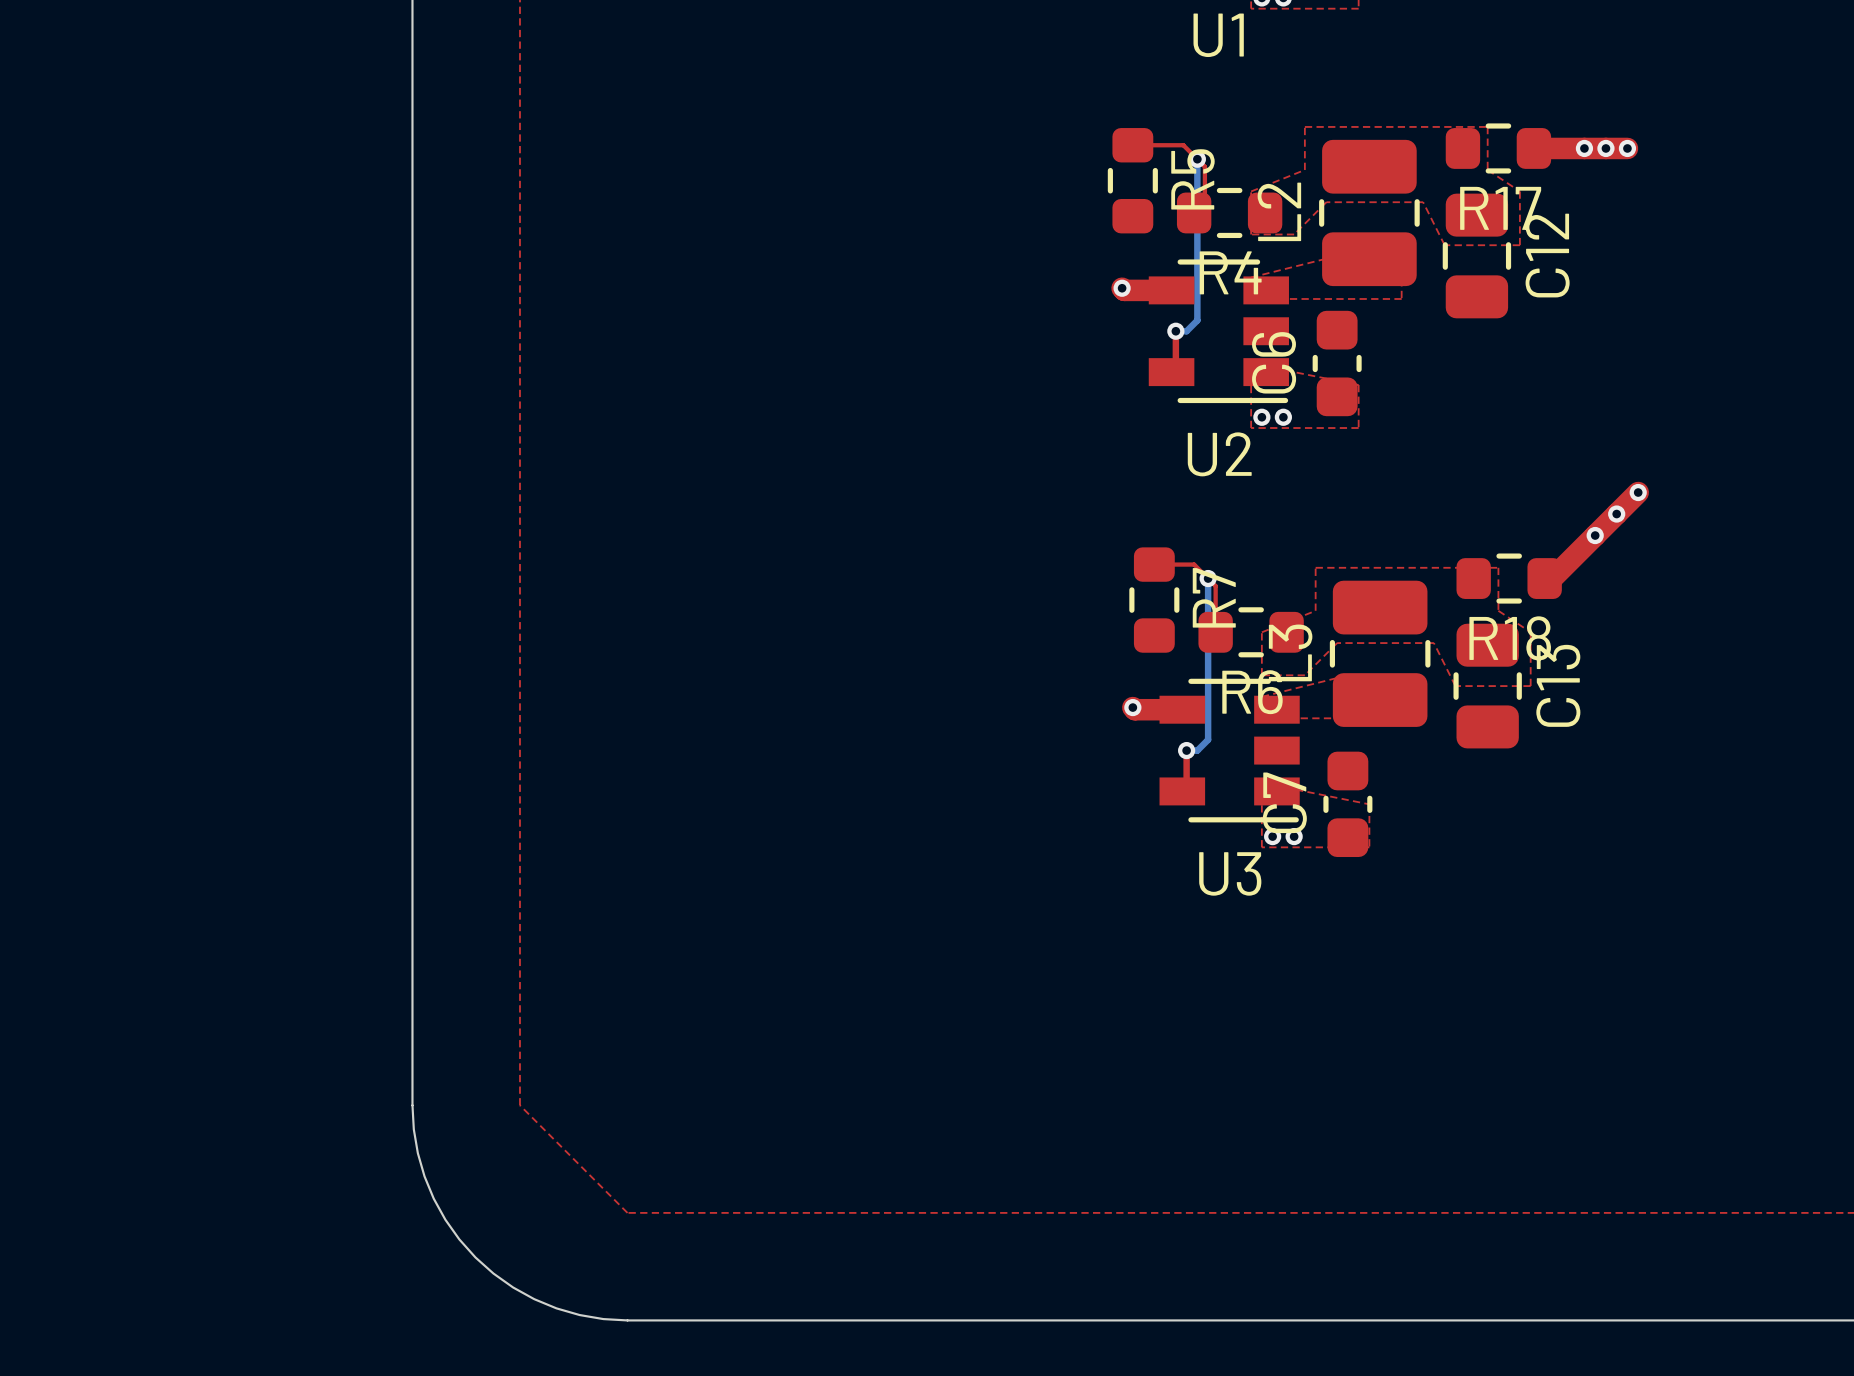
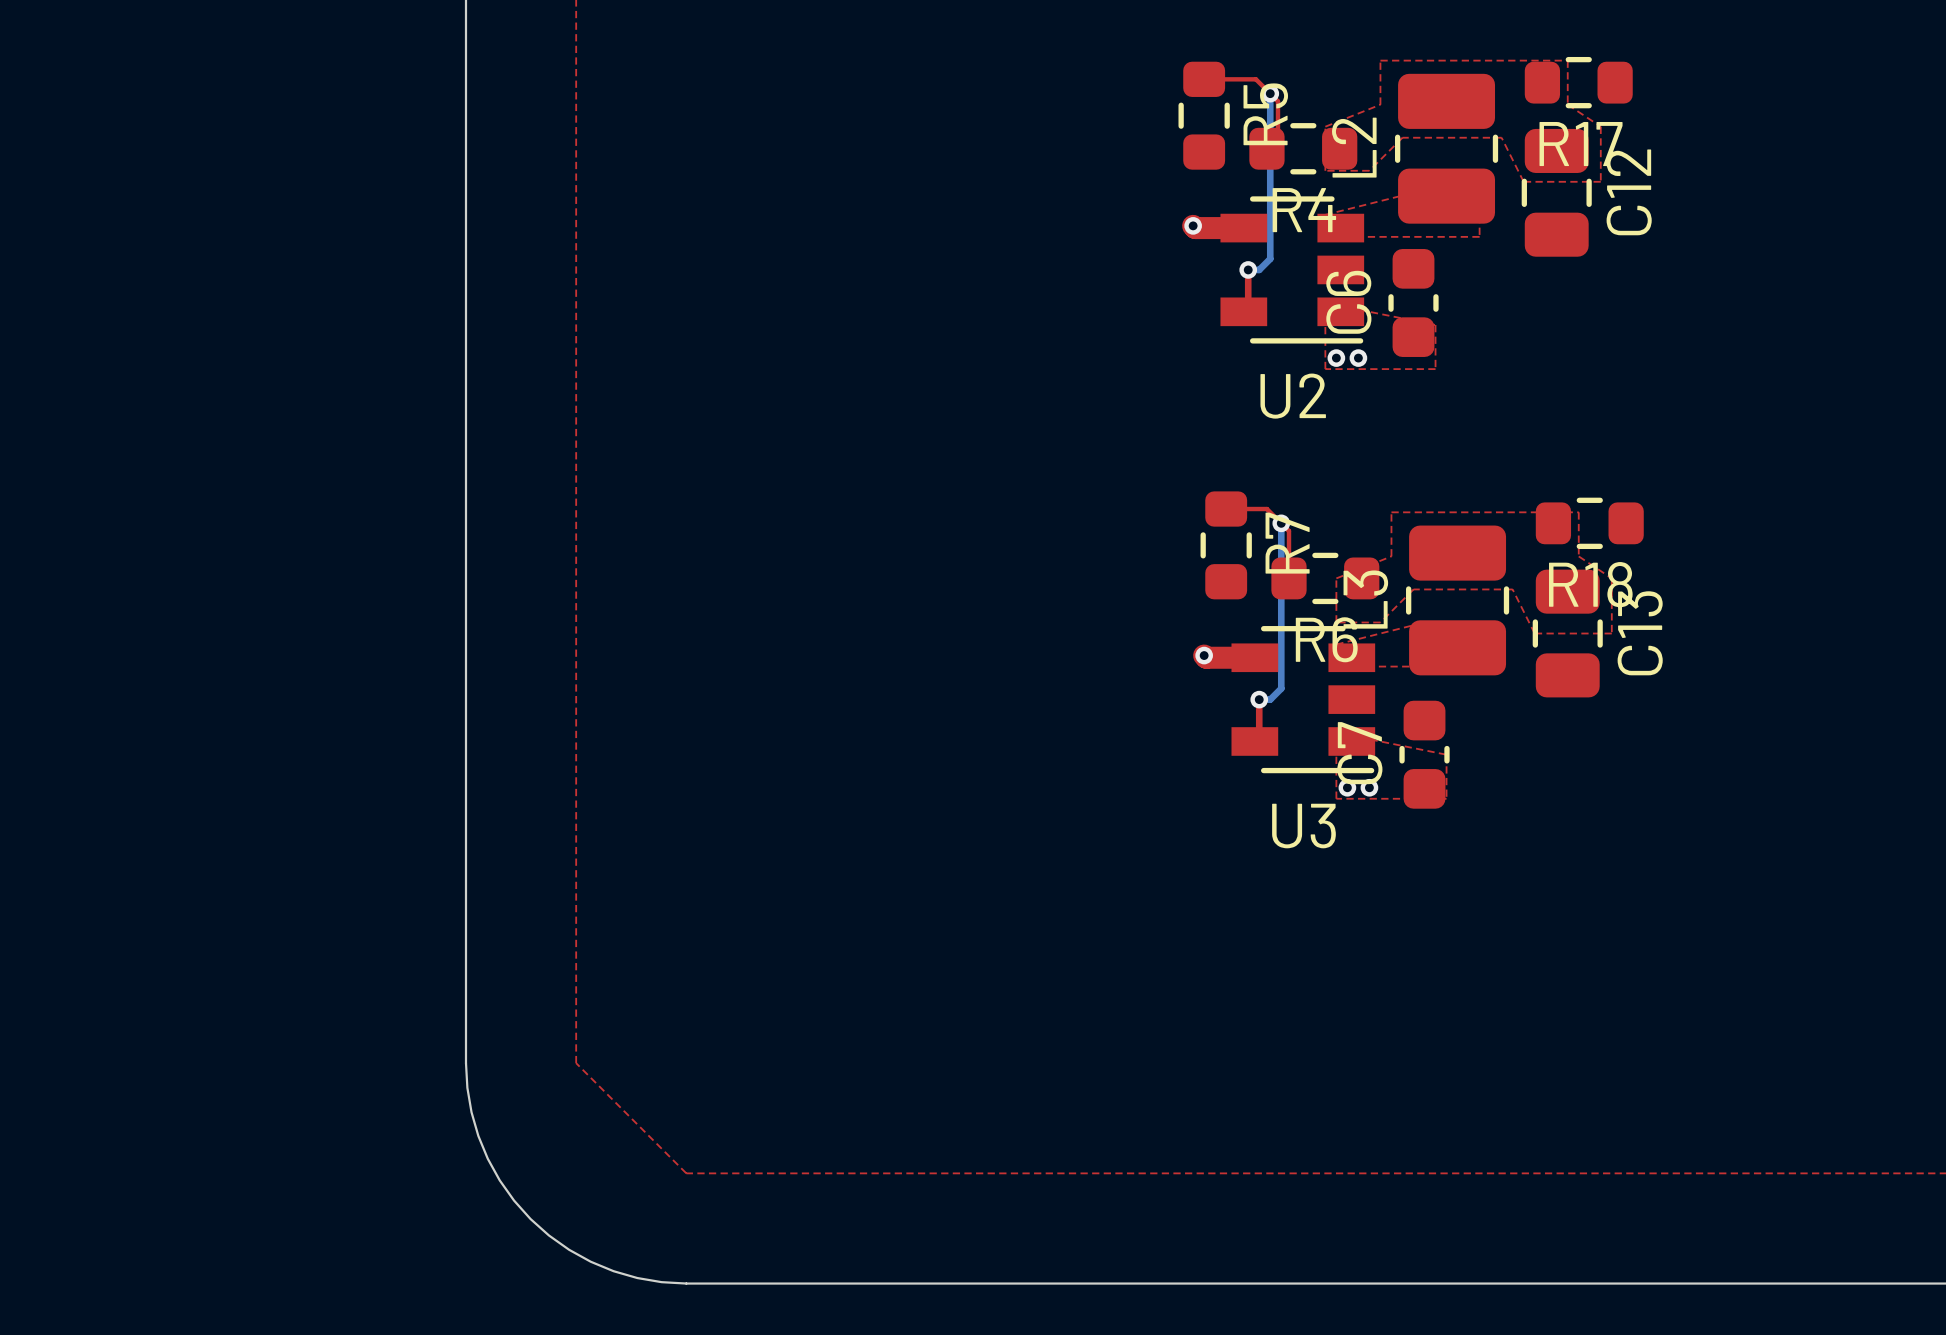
top track: (1533, 148) (1627, 148) -> none
via: (1584, 148) -> none
via: (1605, 148) -> none
via: (1627, 148) -> none
top track: (1638, 492) (1552, 578) (1544, 578) -> none
via: (1638, 492) -> none
via: (1616, 514) -> none
via: (1595, 535) -> none

